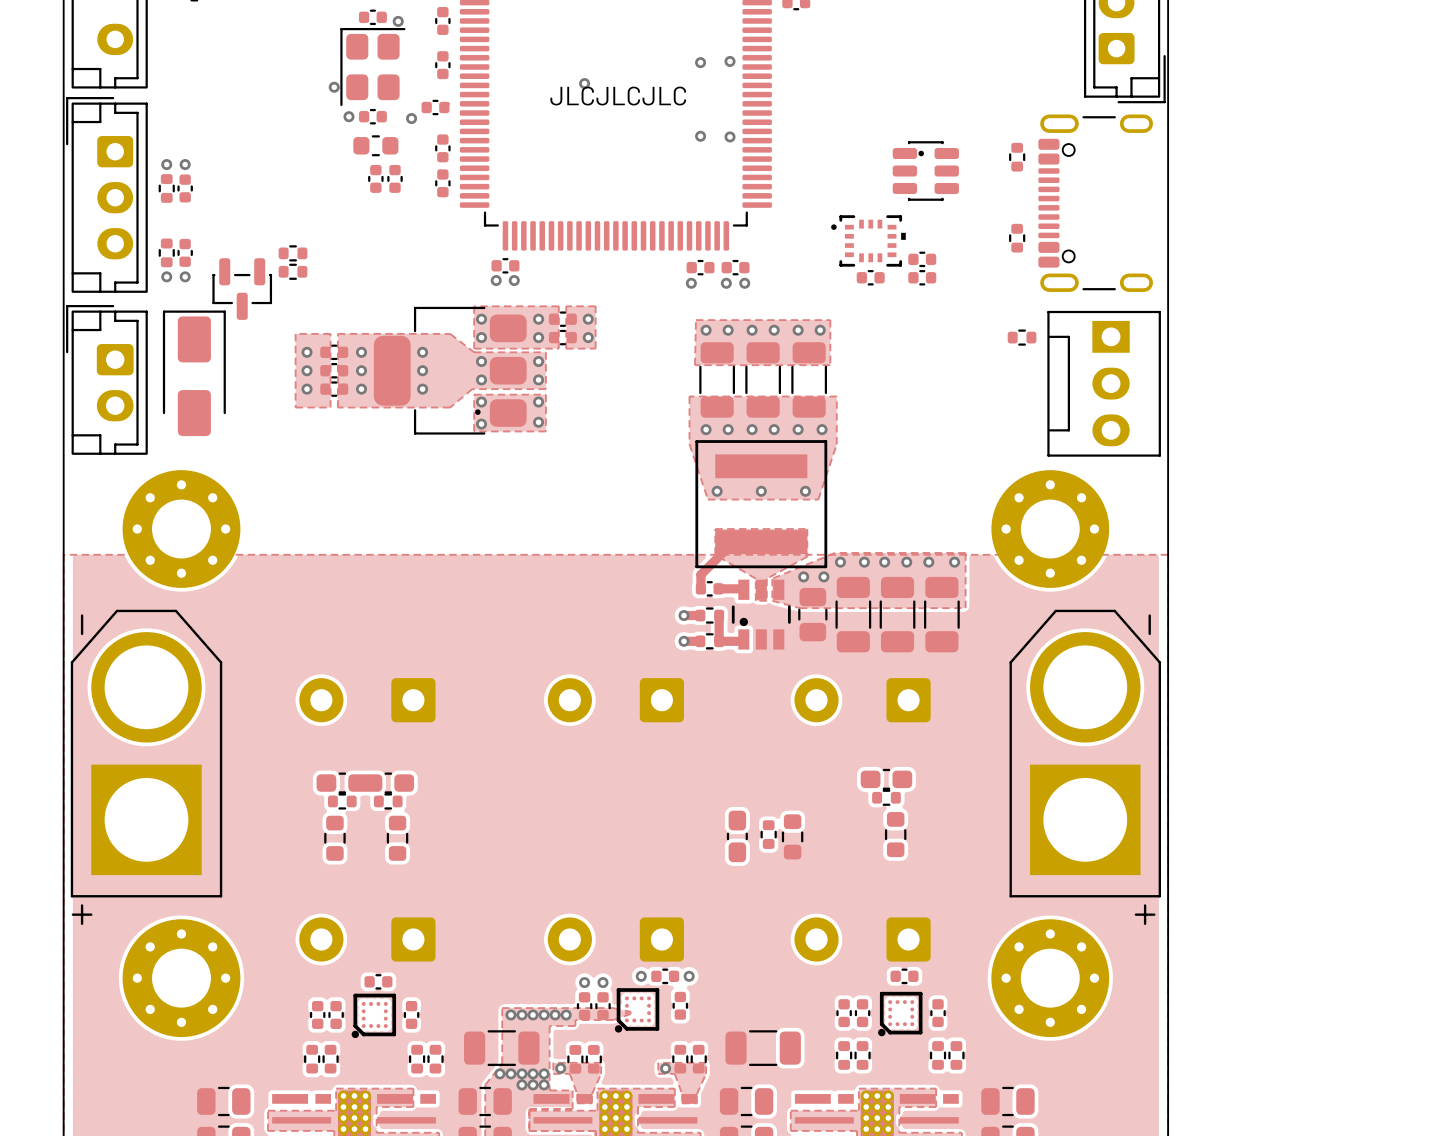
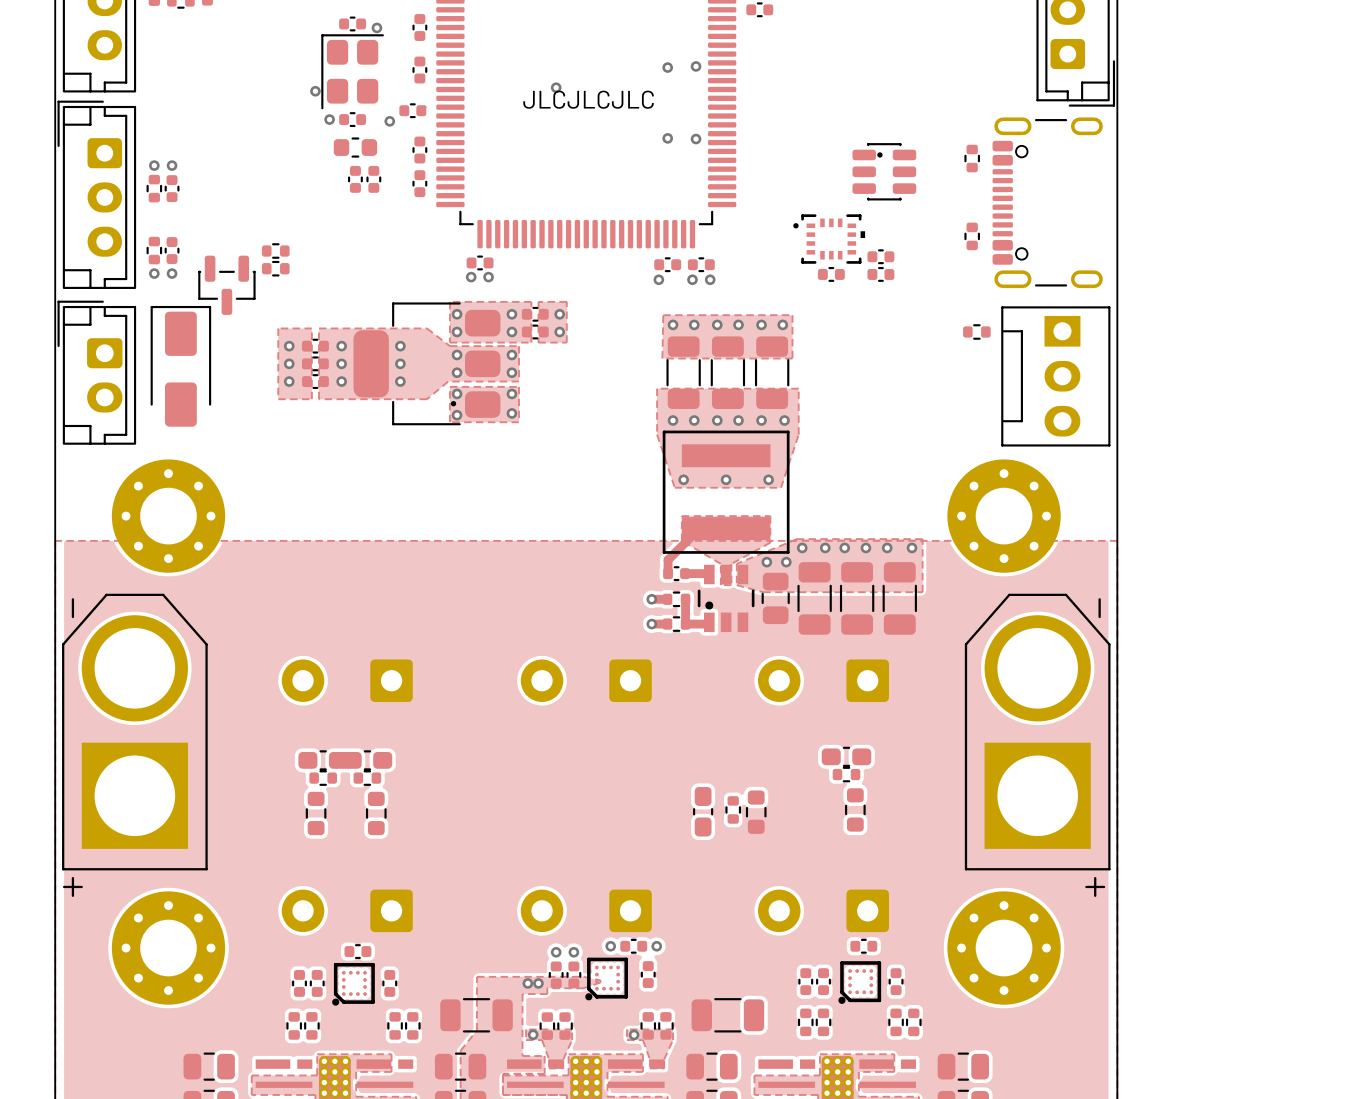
via: (510, 1014) -> none
via: (522, 1014) -> none
via: (533, 1014) -> none
via: (544, 1014) -> none
via: (499, 1073) -> none
via: (510, 1073) -> none
via: (522, 1073) -> none
via: (533, 1073) -> none
via: (544, 1073) -> none
via: (522, 1084) -> none
via: (533, 1084) -> none
via: (544, 1084) -> none

